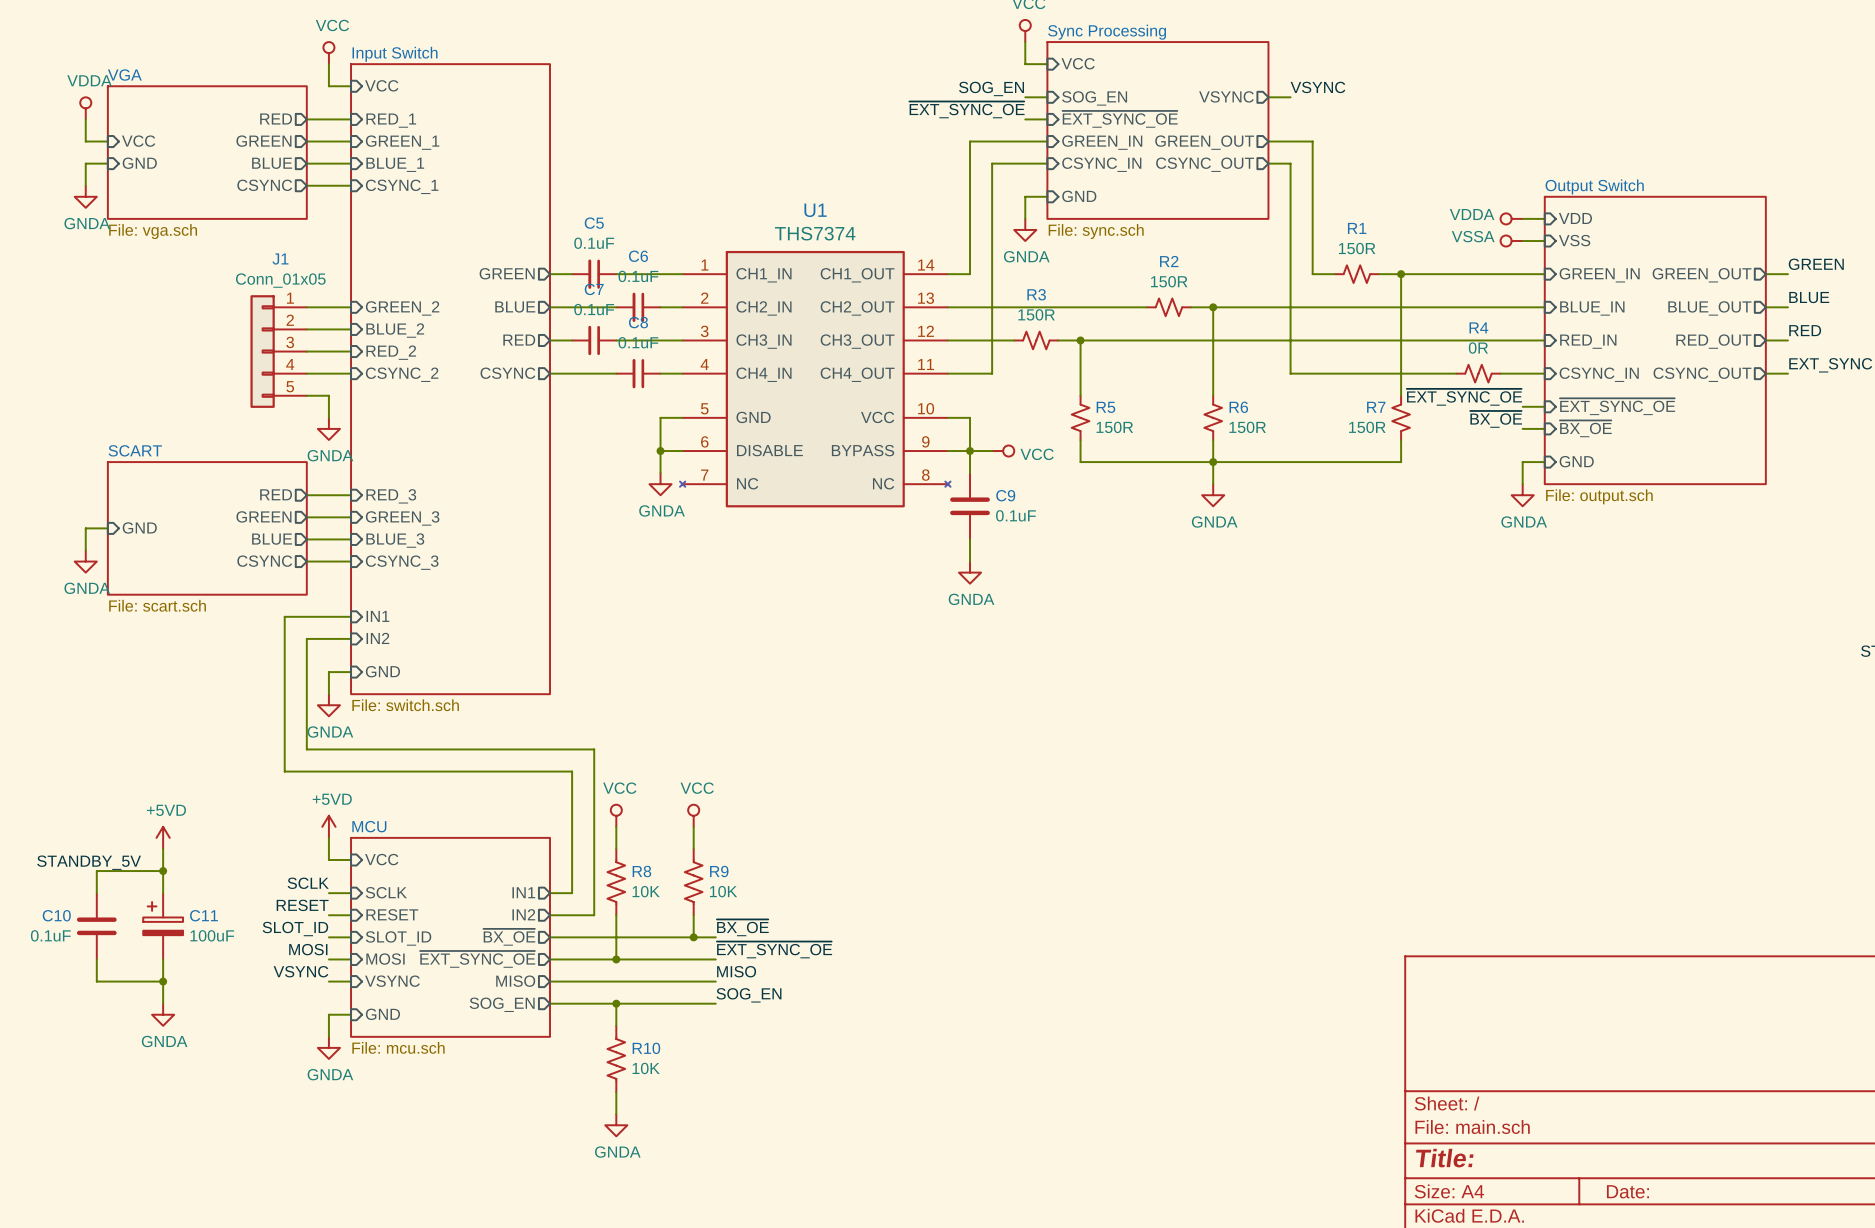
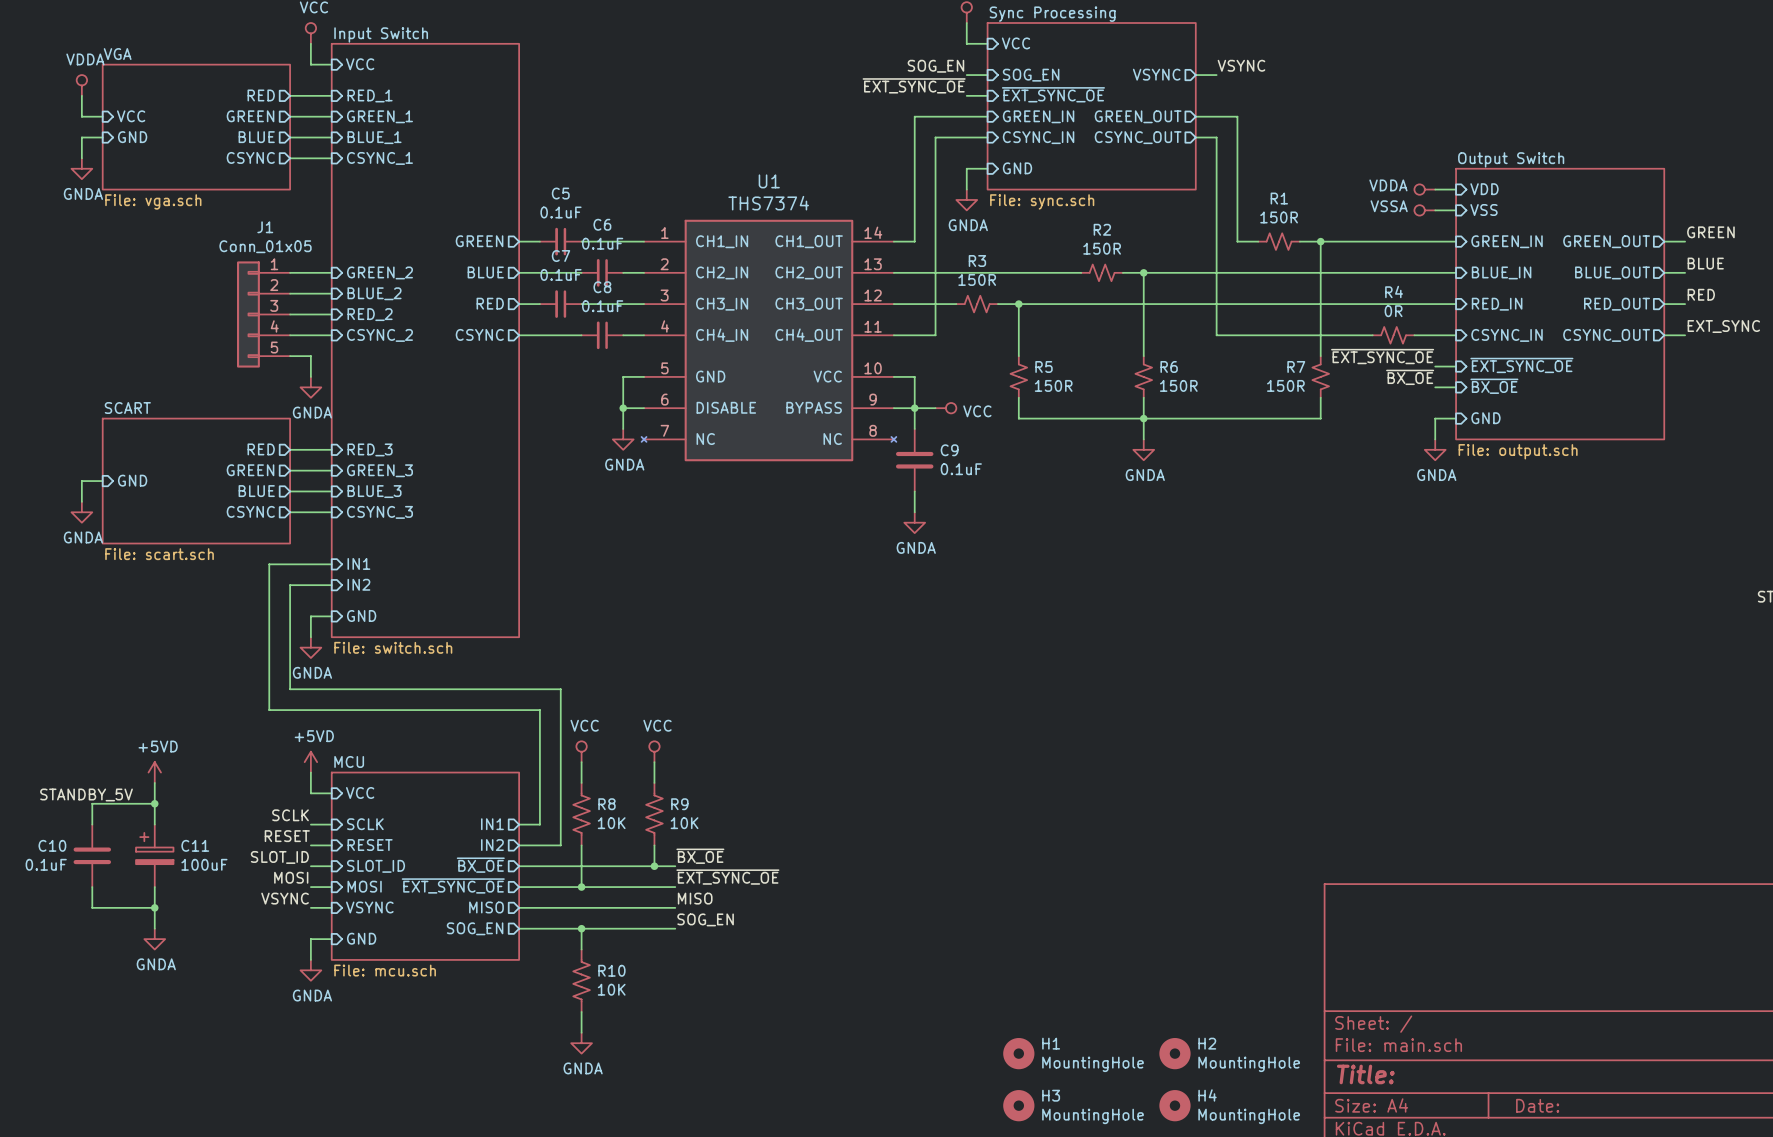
H1: none -> MountingHole (1018, 1053)
H2: none -> MountingHole (1174, 1053)
H3: none -> MountingHole (1018, 1105)
H4: none -> MountingHole (1174, 1105)

